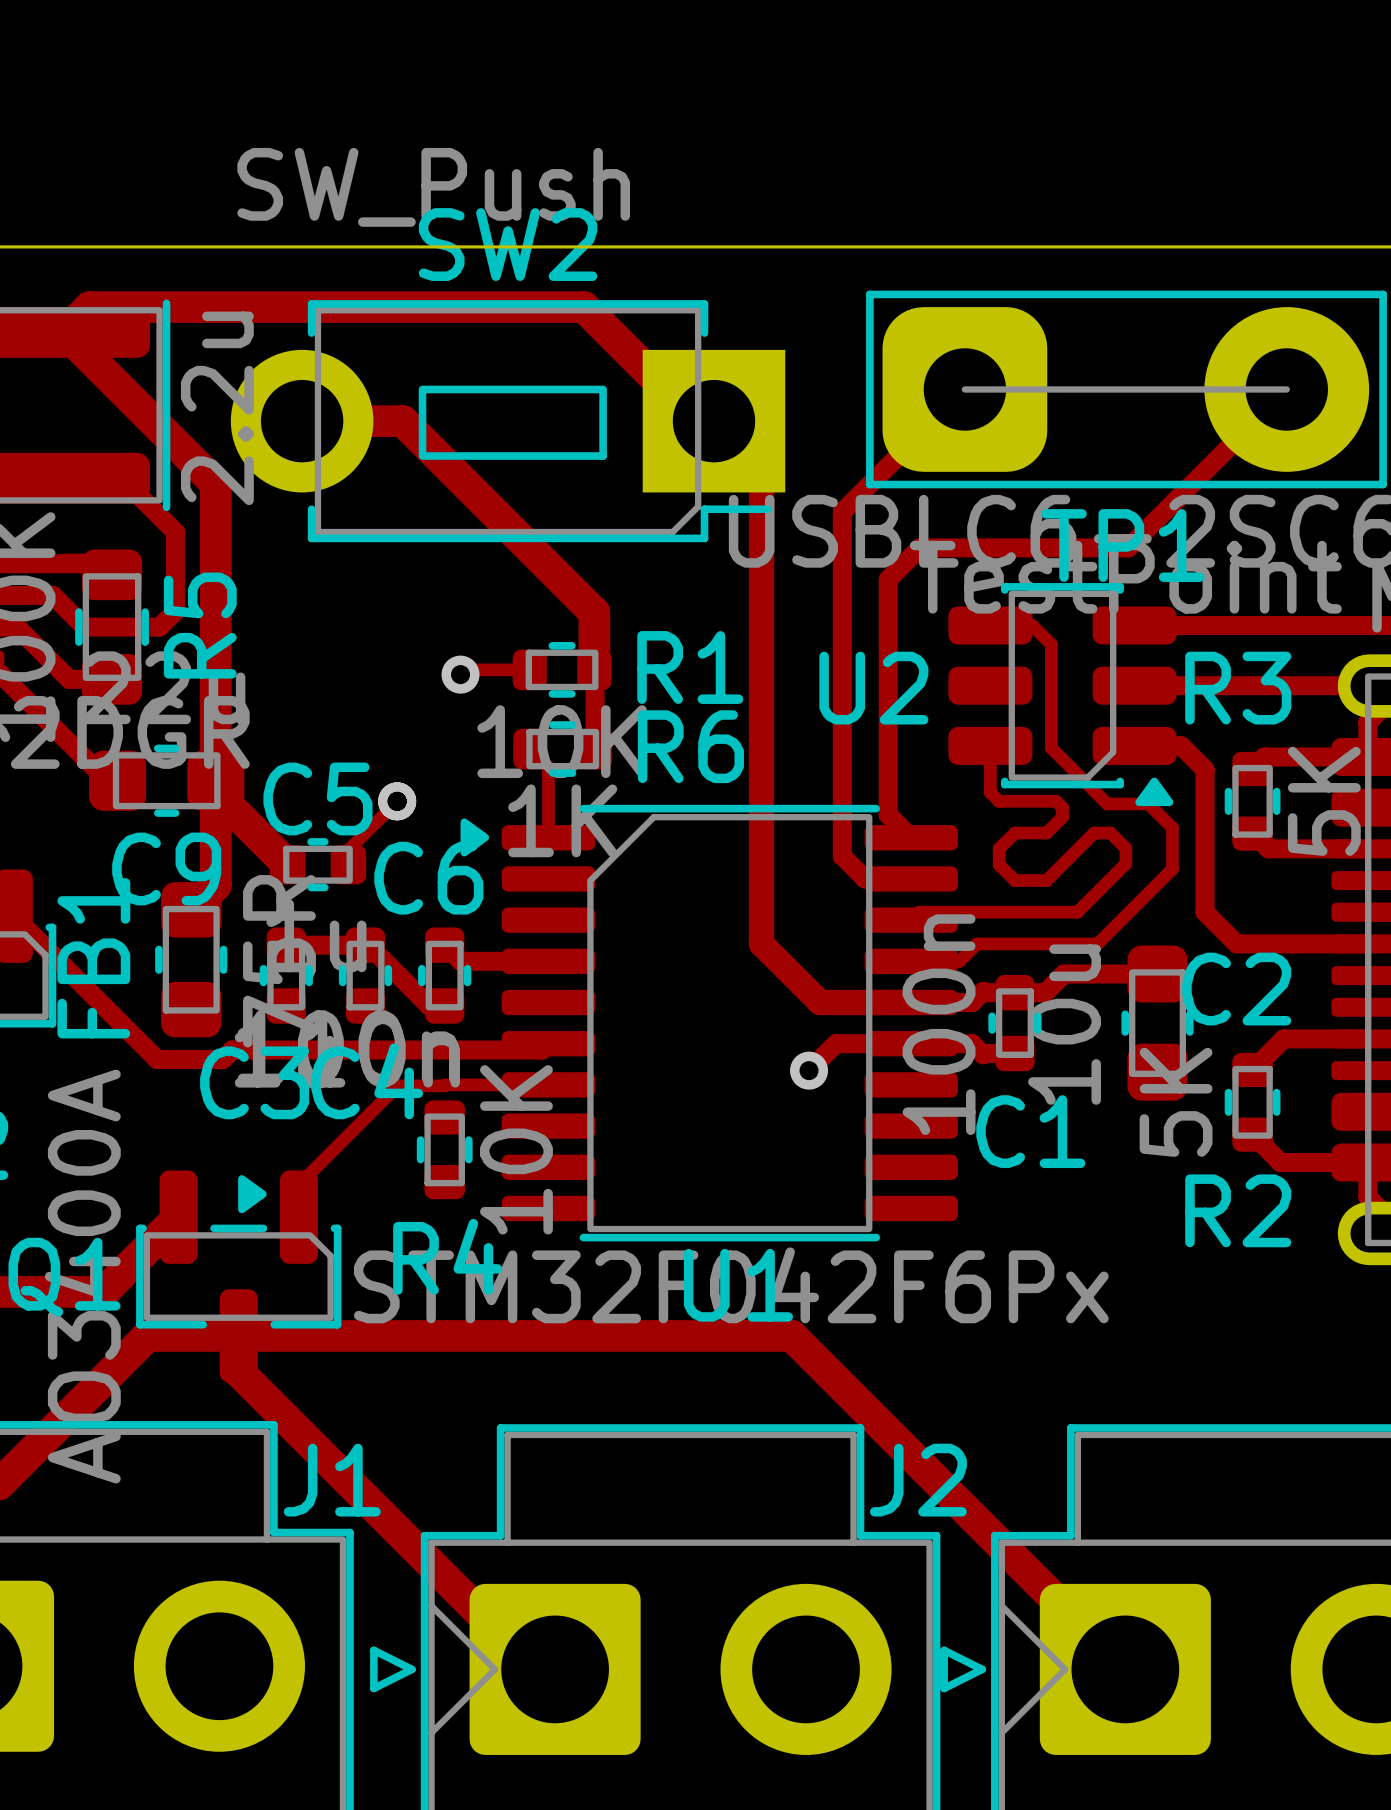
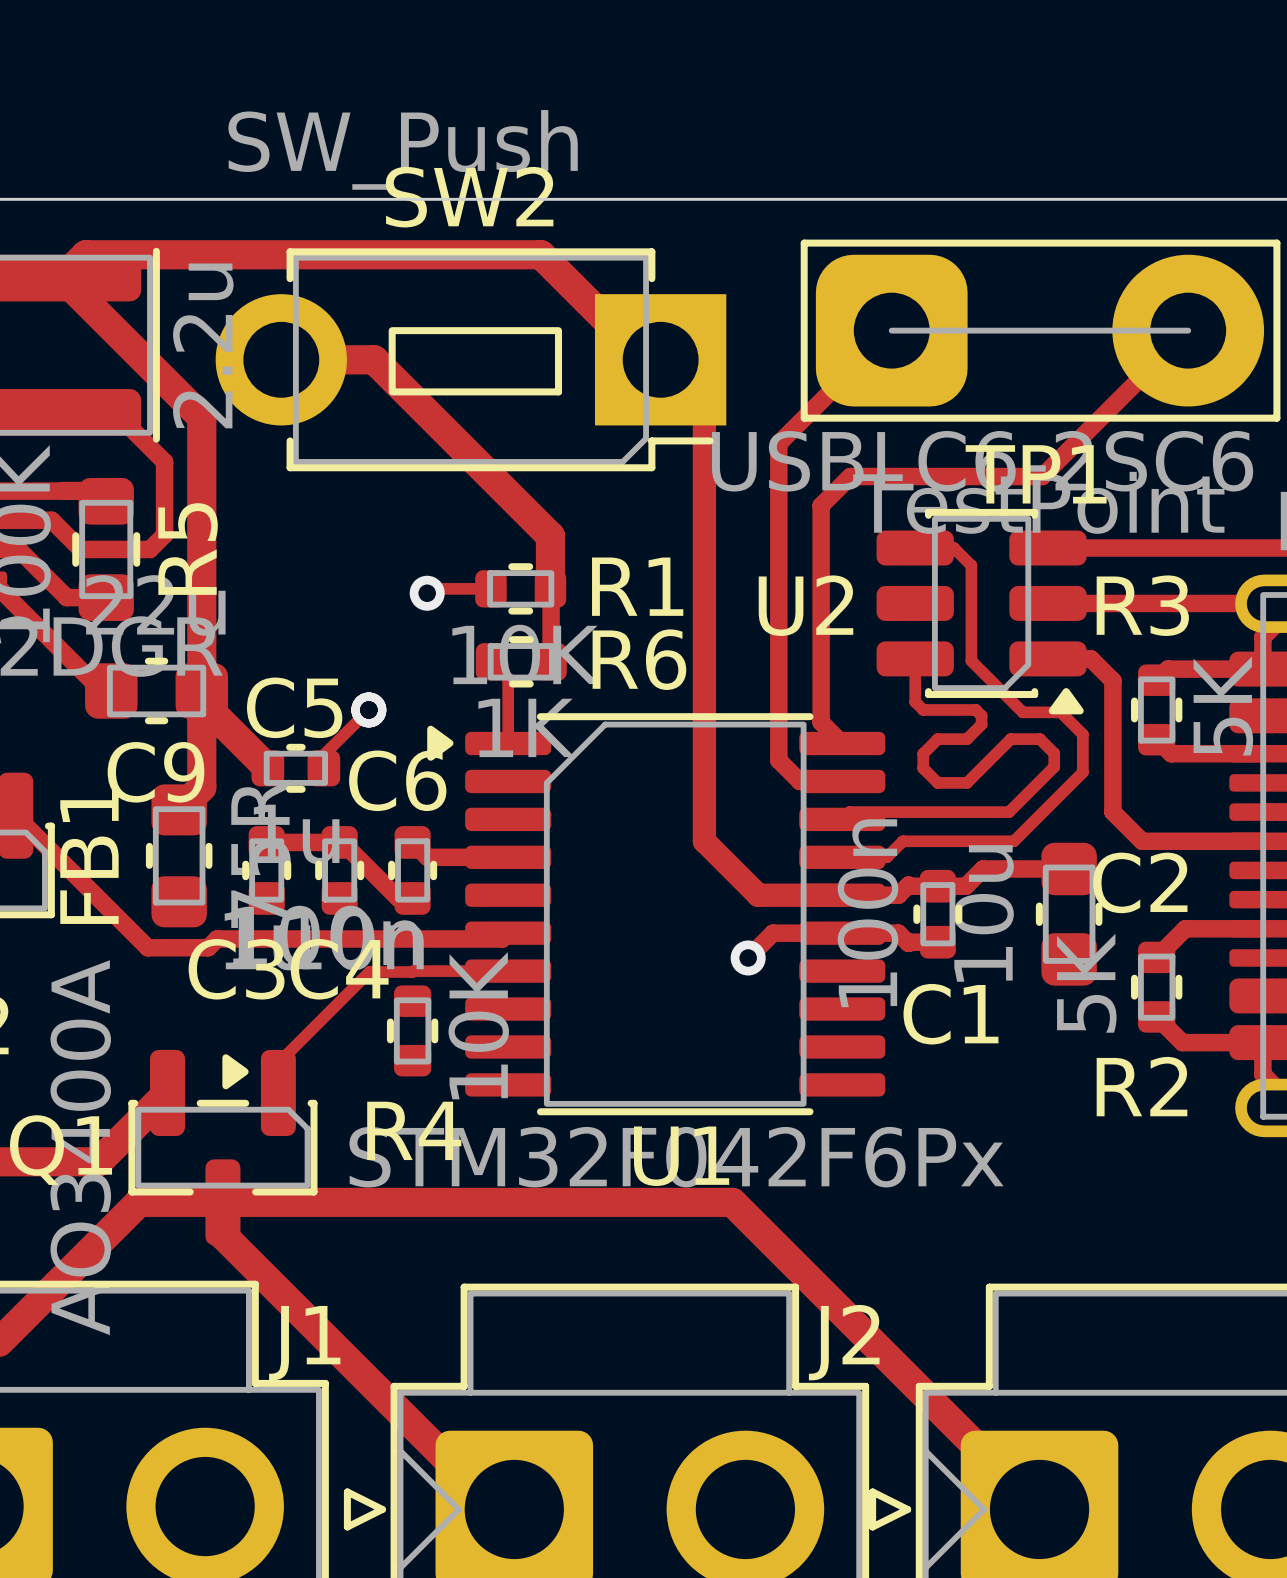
track: (1110, 833) (1125, 848) (1125, 863) (1077, 912) -> (1025, 739) (1039, 739) (1054, 753) (1054, 766) (1009, 812) (995, 812)

